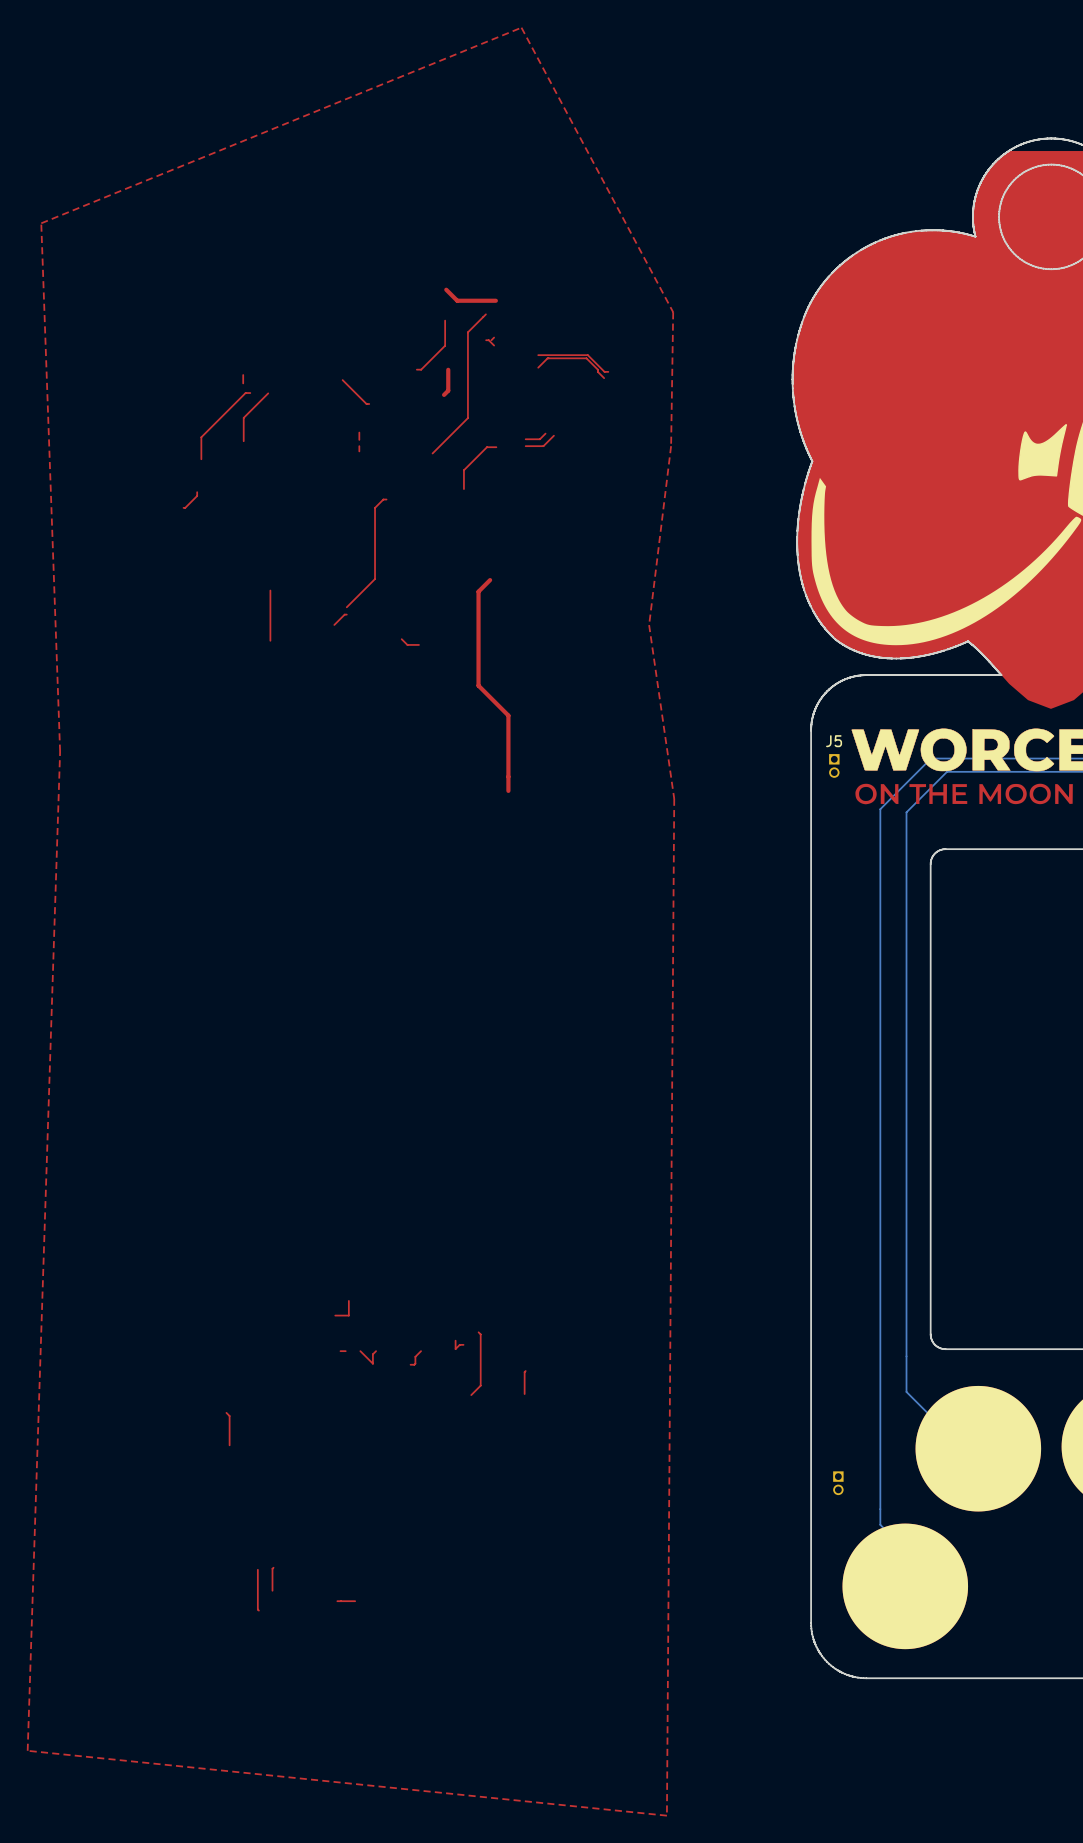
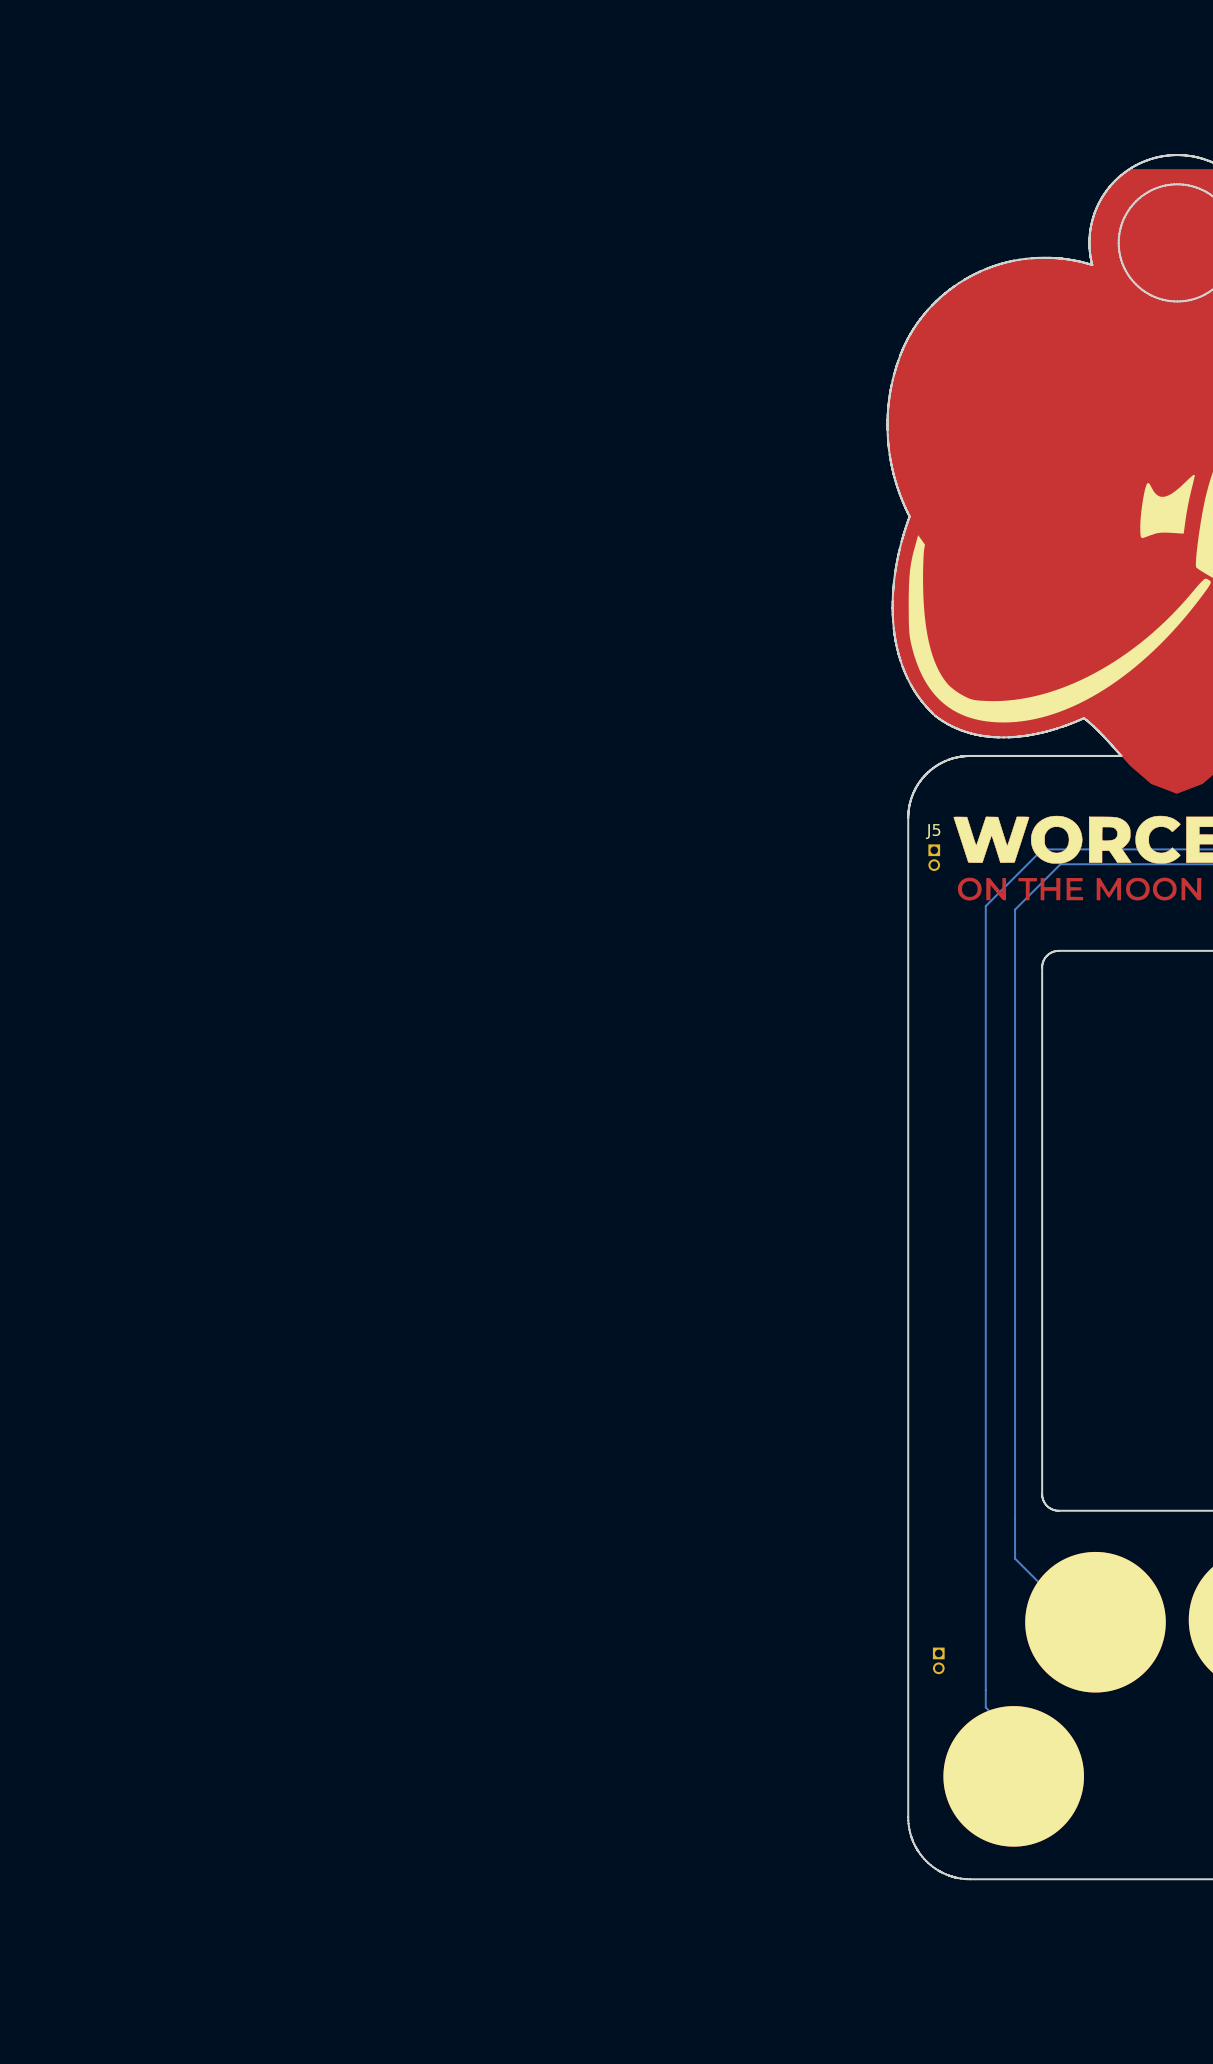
top zone outline: (521, 27) (41, 223) (60, 751) (27, 1750) (666, 1815) (674, 798) (649, 625) (671, 446) (673, 312) (521, 27) -> none
top track: (446, 289) (457, 300) (495, 300) -> none
top track: (485, 314) (467, 332) (467, 418) (432, 453) -> none
top track: (445, 320) (445, 345) (421, 369) (416, 369) -> none
top track: (494, 337) (491, 340) -> none
top track: (486, 340) (494, 345) -> none
top track: (538, 355) (587, 355) (604, 371) (608, 371) -> none
top track: (538, 367) (547, 358) (586, 358) (604, 378) -> none
top track: (448, 369) (448, 390) (444, 394) -> none
top track: (243, 375) (243, 383) -> none
top track: (342, 380) (366, 404) (369, 404) -> none
top track: (250, 393) (245, 393) (201, 437) (201, 459) -> none
top track: (268, 393) (243, 417) (243, 441) -> none
top track: (359, 432) (359, 439) -> none
top track: (545, 433) (539, 439) (525, 439) -> none
top track: (553, 435) (543, 446) (525, 446) -> none
top track: (359, 446) (359, 451) -> none
top track: (496, 447) (486, 447) (463, 470) (463, 489) -> none
top track: (197, 492) (197, 495) (183, 507) -> none
top track: (386, 499) (383, 499) (375, 507) (375, 579) (346, 607) -> none
top track: (490, 580) (478, 591) (478, 685) (508, 715) (508, 790) -> none
top track: (270, 590) (270, 640) -> none
top track: (346, 614) (334, 624) -> none
top track: (401, 639) (407, 644) (418, 644) -> none
top track: (348, 1300) (348, 1315) (335, 1315) -> none
top track: (478, 1332) (480, 1334) (480, 1385) (471, 1395) -> none
top track: (455, 1340) (455, 1349) (459, 1344) (463, 1344) -> none
top track: (340, 1351) (345, 1351) -> none
top track: (360, 1351) (372, 1363) (372, 1354) (376, 1351) -> none
top track: (421, 1351) (415, 1356) (415, 1363) (410, 1364) -> none
top track: (525, 1371) (524, 1394) -> none
top track: (226, 1412) (229, 1416) (229, 1445) -> none
top track: (273, 1567) (272, 1590) -> none
top track: (257, 1569) (258, 1610) -> none
top track: (337, 1601) (355, 1601) -> none

